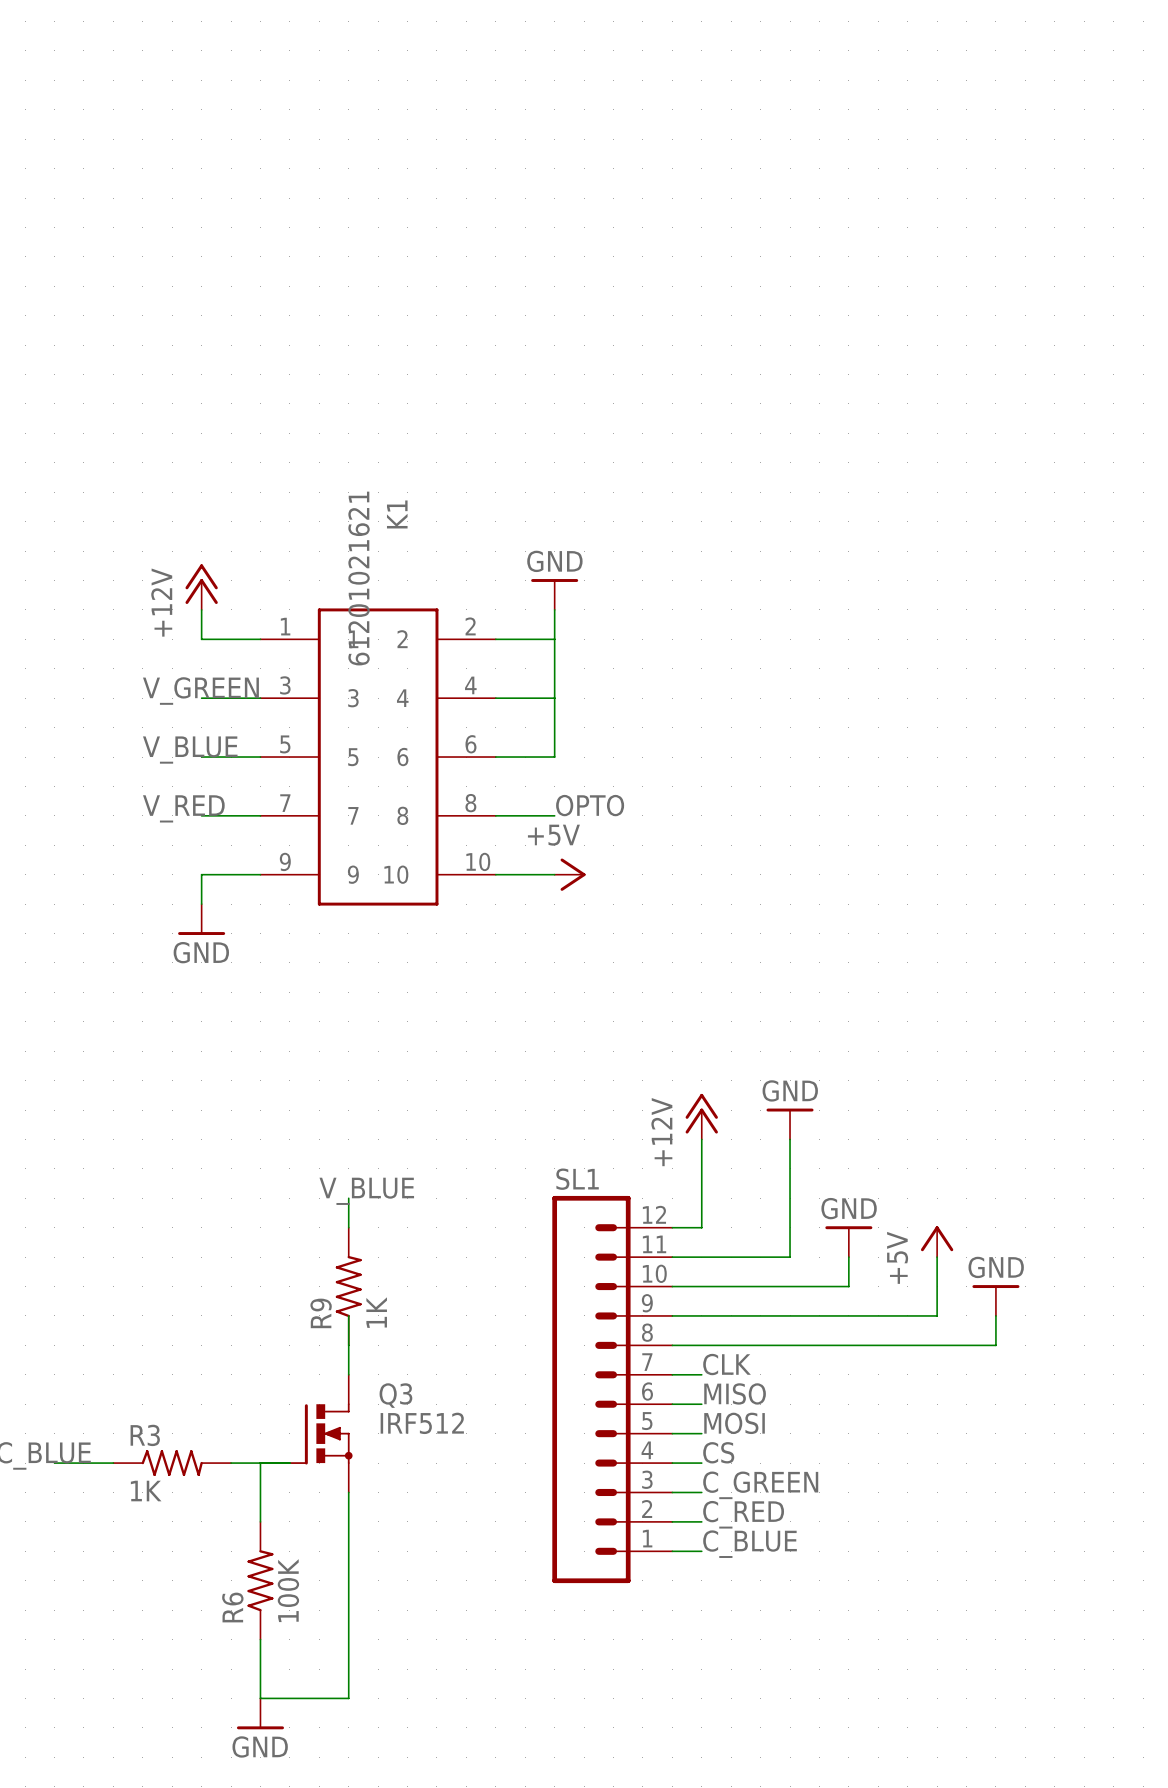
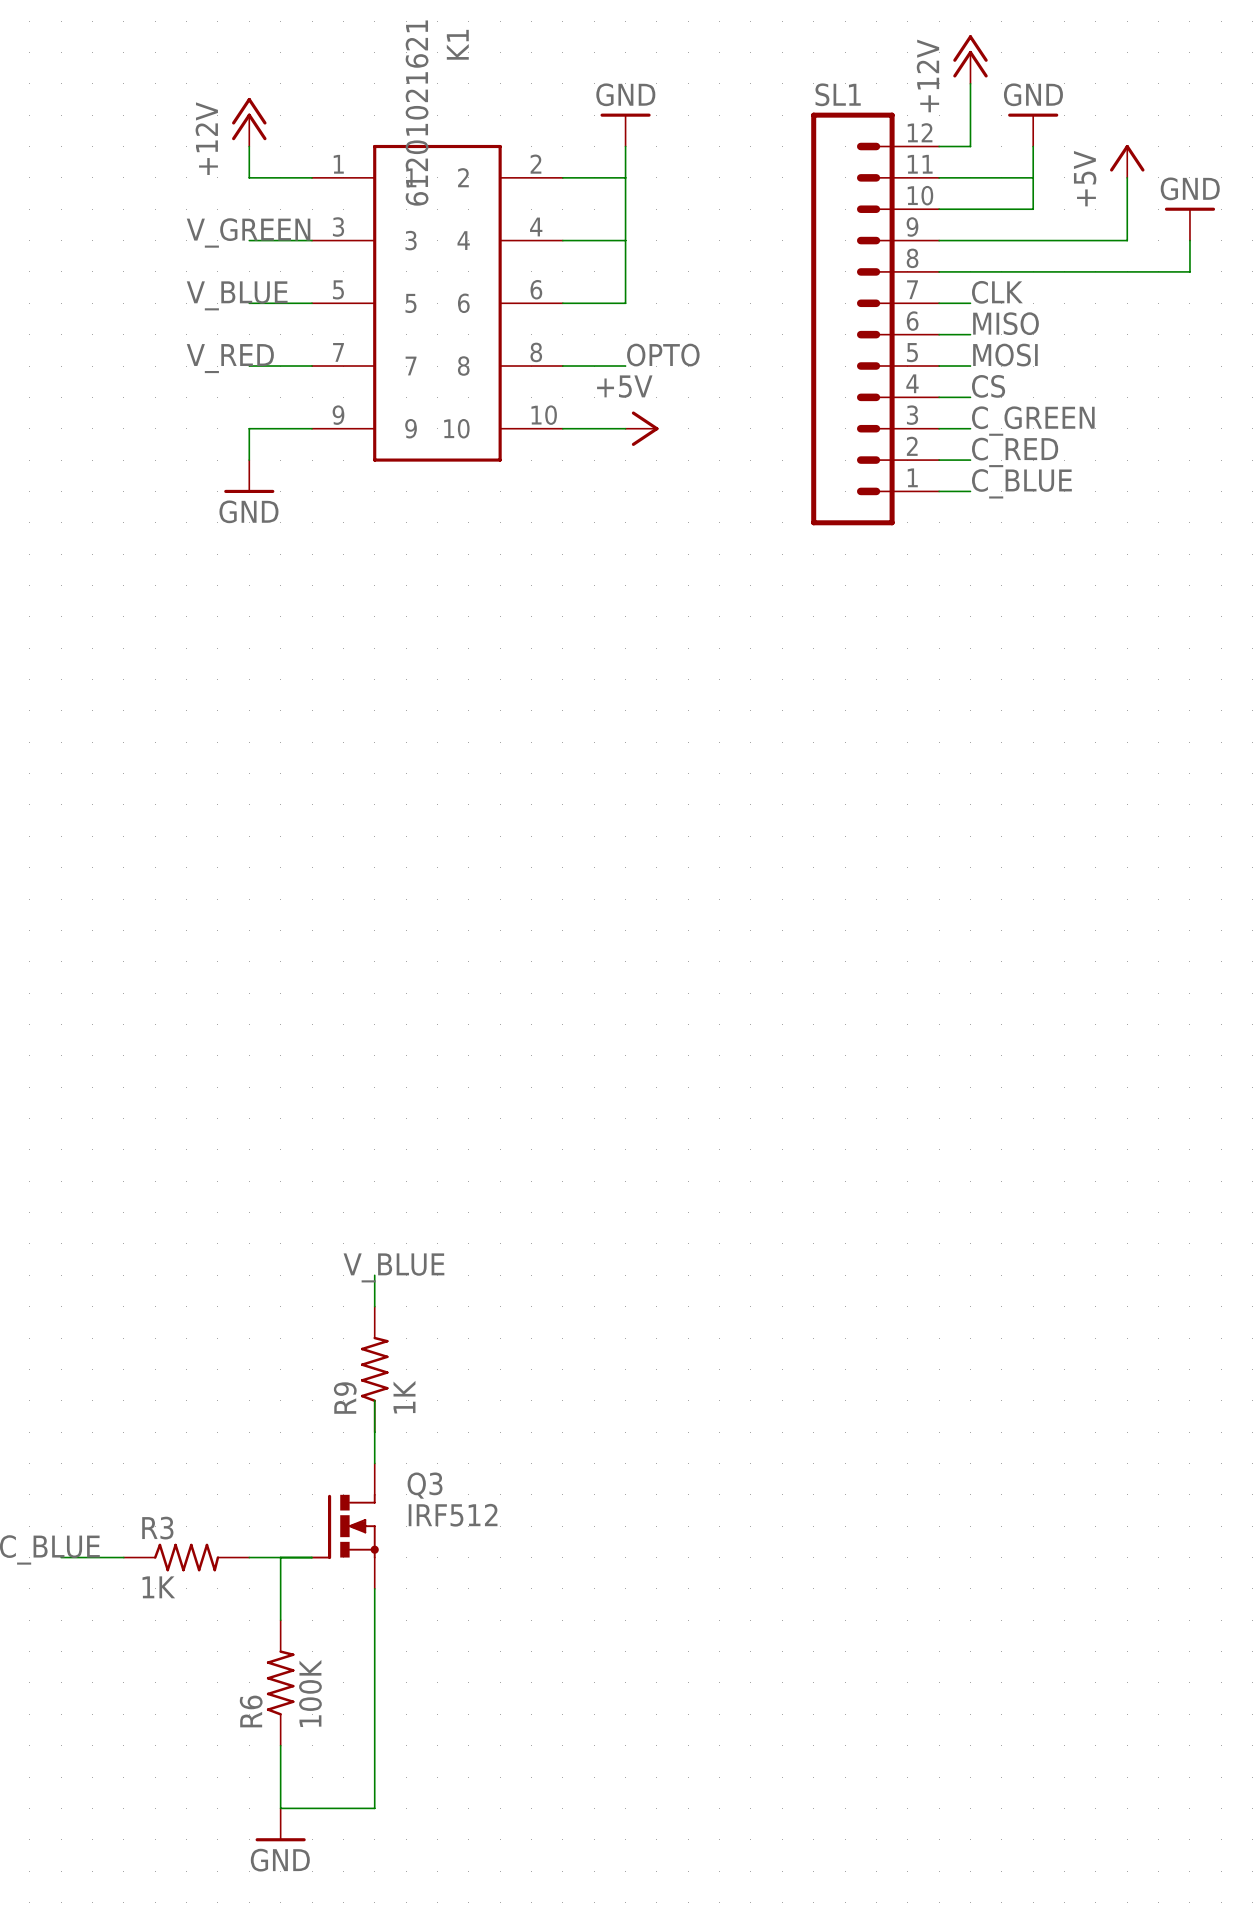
power symbol: none -> +12V (970, 59)
wire: none -> (970, 83) (970, 146) (939, 146)
power symbol: none -> +12V (249, 122)
power symbol: none -> GND (625, 130)
power symbol: none -> GND (1033, 130)
wire: none -> (249, 146) (249, 177) (312, 177)
wire: none -> (625, 146) (625, 303) (562, 303)
wire: none -> (1033, 146) (1033, 209) (939, 209)
power symbol: none -> +5V (1127, 161)
wire: none -> (562, 177) (625, 177)
wire: none -> (939, 177) (1033, 177)
wire: none -> (1127, 177) (1127, 240) (939, 240)
power symbol: none -> GND (1189, 224)
label: none -> V_GREEN (248, 232)
wire: none -> (249, 240) (312, 240)
wire: none -> (562, 240) (625, 240)
wire: none -> (1189, 240) (1189, 271) (939, 271)
label: none -> CLK (997, 292)
label: none -> V_BLUE (237, 295)
wire: none -> (249, 303) (312, 303)
wire: none -> (939, 303) (970, 303)
label: none -> MISO (1006, 323)
wire: none -> (939, 334) (970, 334)
label: none -> OPTO (663, 355)
label: none -> MOSI (1005, 355)
label: none -> V_RED (230, 358)
wire: none -> (249, 366) (312, 366)
wire: none -> (562, 366) (625, 366)
wire: none -> (939, 366) (970, 366)
label: none -> CS (988, 386)
wire: none -> (939, 397) (970, 397)
label: none -> C_GREEN (1033, 421)
wire: none -> (312, 428) (249, 428) (249, 460)
power symbol: none -> +5V (642, 428)
wire: none -> (939, 428) (970, 428)
label: none -> C_RED (1015, 452)
wire: none -> (939, 460) (970, 460)
power symbol: none -> GND (249, 476)
label: none -> C_BLUE (1021, 483)
wire: none -> (939, 491) (970, 491)
power symbol: +12V (201, 587) -> none
power symbol: GND (554, 594) -> none
wire: (201, 609) (201, 639) (260, 639) -> none
wire: (554, 609) (554, 757) (495, 757) -> none
wire: (495, 639) (554, 639) -> (562, 428) (625, 428)
label: V_GREEN (200, 691) -> none
wire: (201, 698) (260, 698) -> none
wire: (495, 698) (554, 698) -> none
label: V_BLUE (190, 750) -> none
wire: (201, 757) (260, 757) -> none
K1 position: (378, 757) -> (437, 303)
label: OPTO (590, 805) -> none
label: V_RED (183, 808) -> none
wire: (201, 815) (260, 815) -> none
wire: (495, 815) (554, 815) -> none
wire: (260, 874) (201, 874) (201, 904) -> none
wire: (495, 874) (554, 874) -> none
power symbol: +5V (570, 874) -> none
power symbol: GND (201, 919) -> none
power symbol: +12V (701, 1116) -> none
power symbol: GND (790, 1124) -> none
wire: (701, 1139) (701, 1227) (672, 1227) -> none
wire: (790, 1139) (790, 1257) (672, 1257) -> none
power symbol: GND (848, 1241) -> none
power symbol: +5V (937, 1241) -> none
wire: (848, 1257) (848, 1286) (672, 1286) -> none
wire: (937, 1257) (937, 1315) (672, 1315) -> none
power symbol: GND (995, 1300) -> none
wire: (995, 1315) (995, 1345) (672, 1345) -> none
label: CLK (727, 1364) -> none
wire: (672, 1374) (701, 1374) -> none
SL1 position: (612, 1389) -> (875, 318)
label: MISO (735, 1393) -> none
wire: (672, 1404) (701, 1404) -> none
label: MOSI (734, 1423) -> none
wire: (672, 1433) (701, 1433) -> none
label: CS (718, 1452) -> none
wire: (672, 1463) (701, 1463) -> none
label: C_GREEN (760, 1485) -> none
wire: (672, 1492) (701, 1492) -> none
label: C_RED (743, 1514) -> none
wire: (672, 1521) (701, 1521) -> none
label: C_BLUE (750, 1544) -> none
wire: (672, 1551) (701, 1551) -> none

